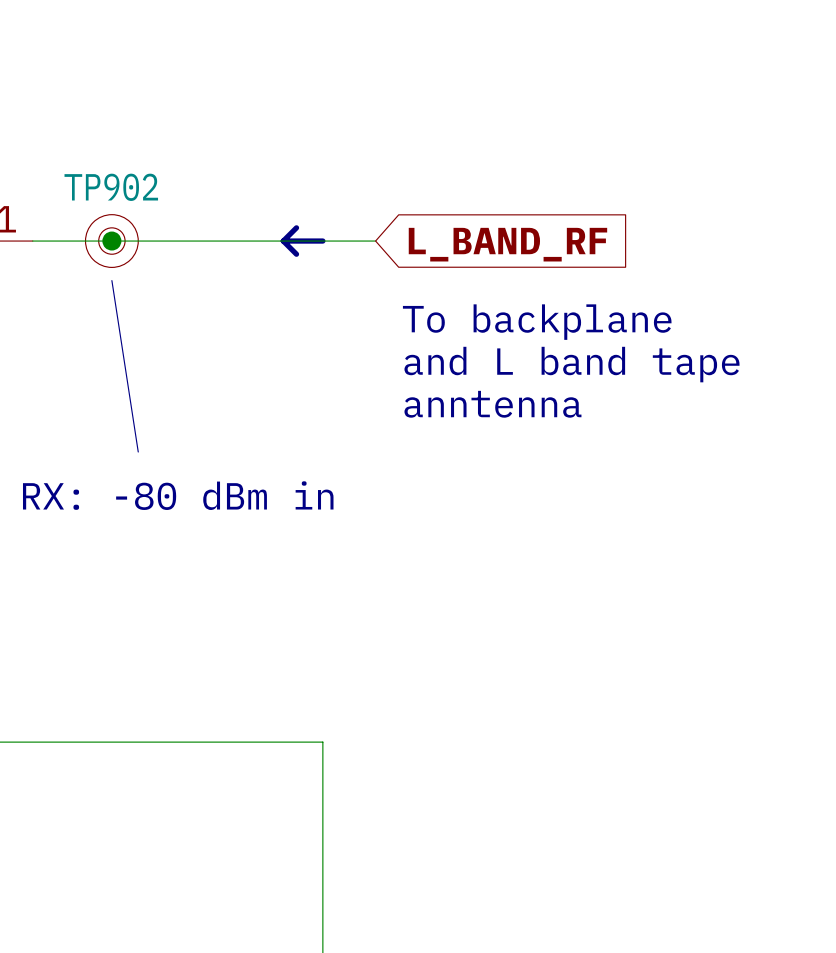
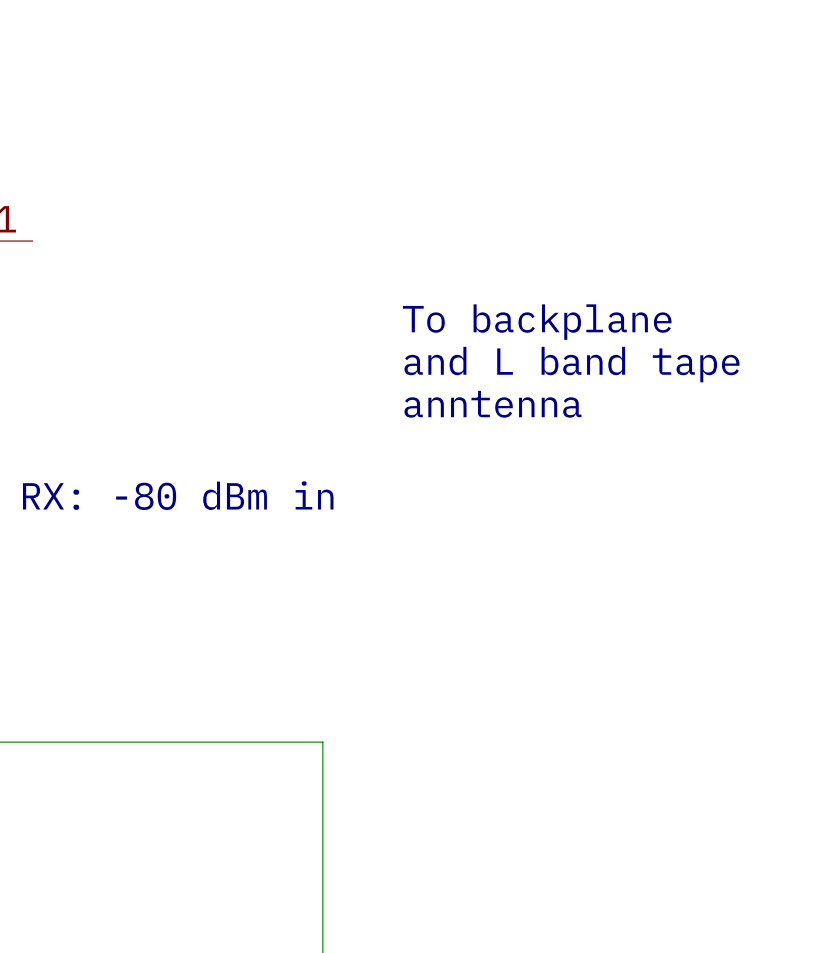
line: (296, 227) (283, 241) -> none
wire: (32, 241) (375, 241) -> none
junction: (111, 241) -> none
TP902: (111, 241) -> none
line: (283, 241) (322, 241) -> none
line: (283, 241) (296, 254) -> none
global label: L_BAND_RF (507, 244) -> none
line: (111, 280) (138, 452) -> none

